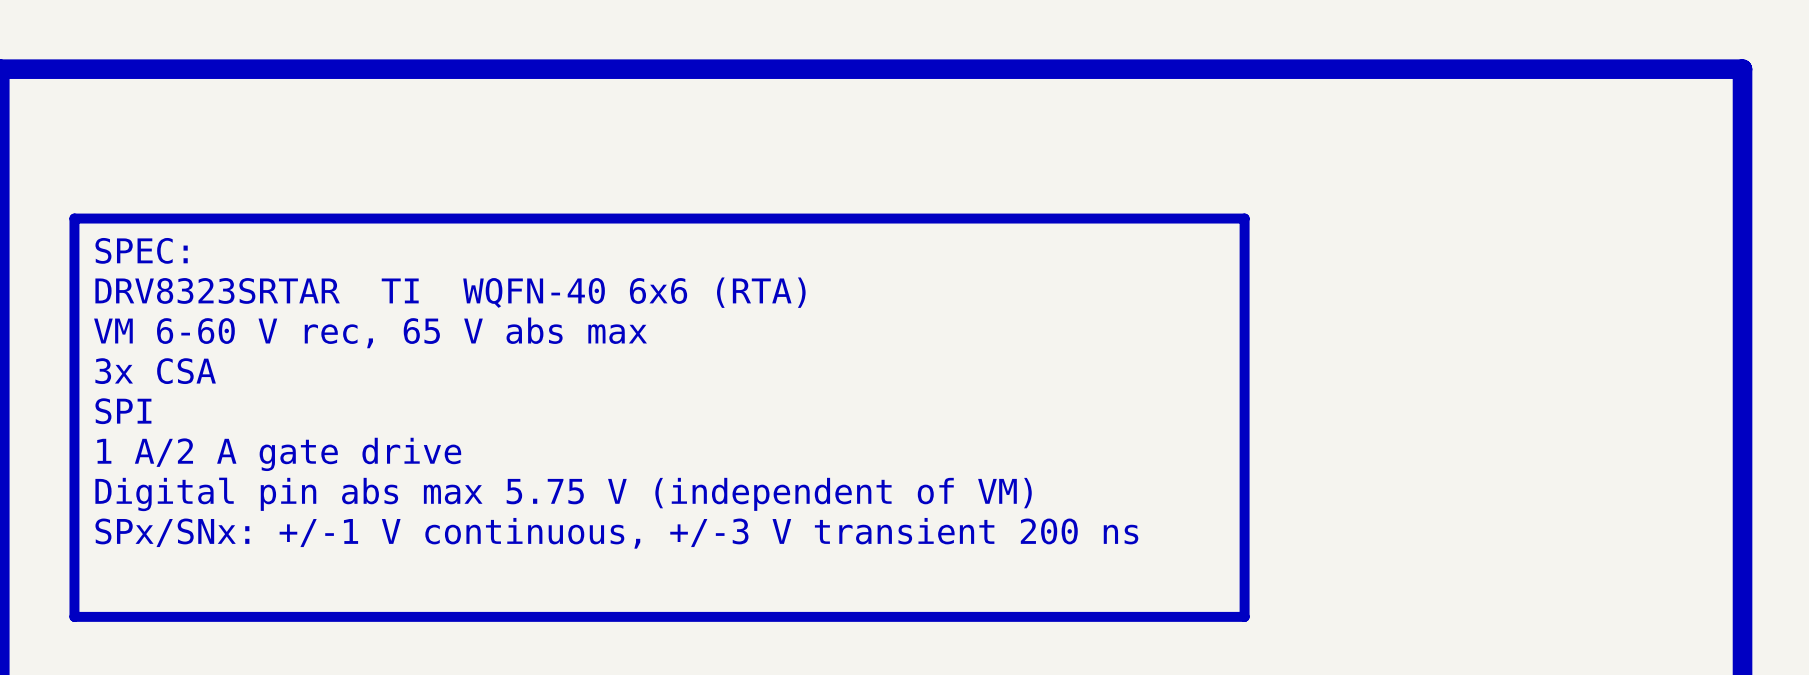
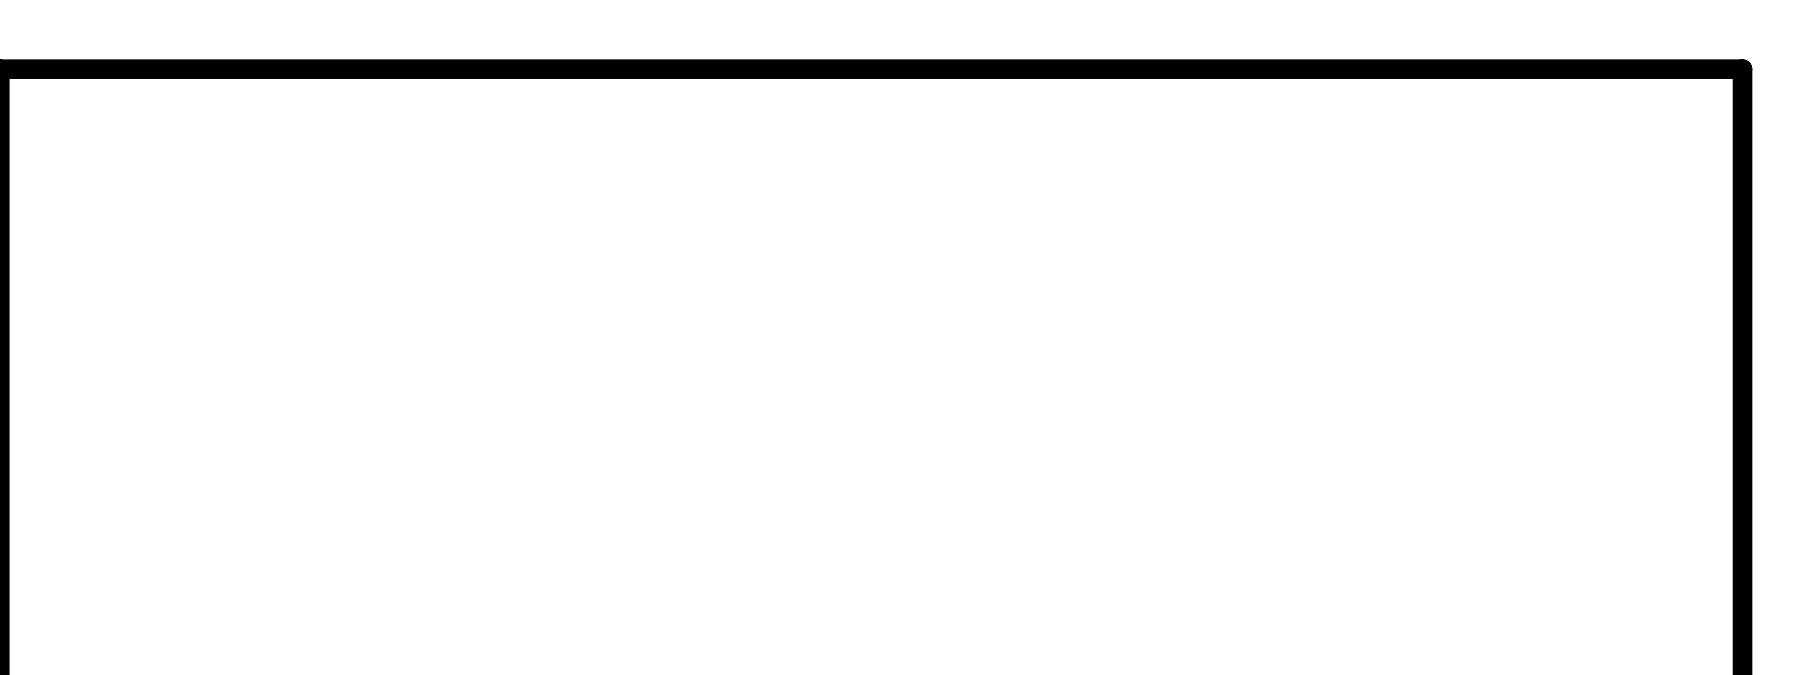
line: (74, 218) (1244, 218) (1244, 616) (74, 616) (74, 218) -> none
text: SPEC: (141, 250) -> none
text: DRV8323SRTAR TI WQFN-40 6x6 (RTA) (450, 292) -> none
text: VM 6-60 V rec, 65 V abs max (370, 332) -> none
text: 3x CSA (155, 371) -> none
text: SPI (123, 411) -> none
text: 1 A/2 A gate drive (279, 454) -> none
text: Digital pin abs max 5.75 V (independent of VM) (563, 494) -> none
text: SPx/SNx: +/-1 V continuous, +/-3 V transient 200 ns (616, 533) -> none

